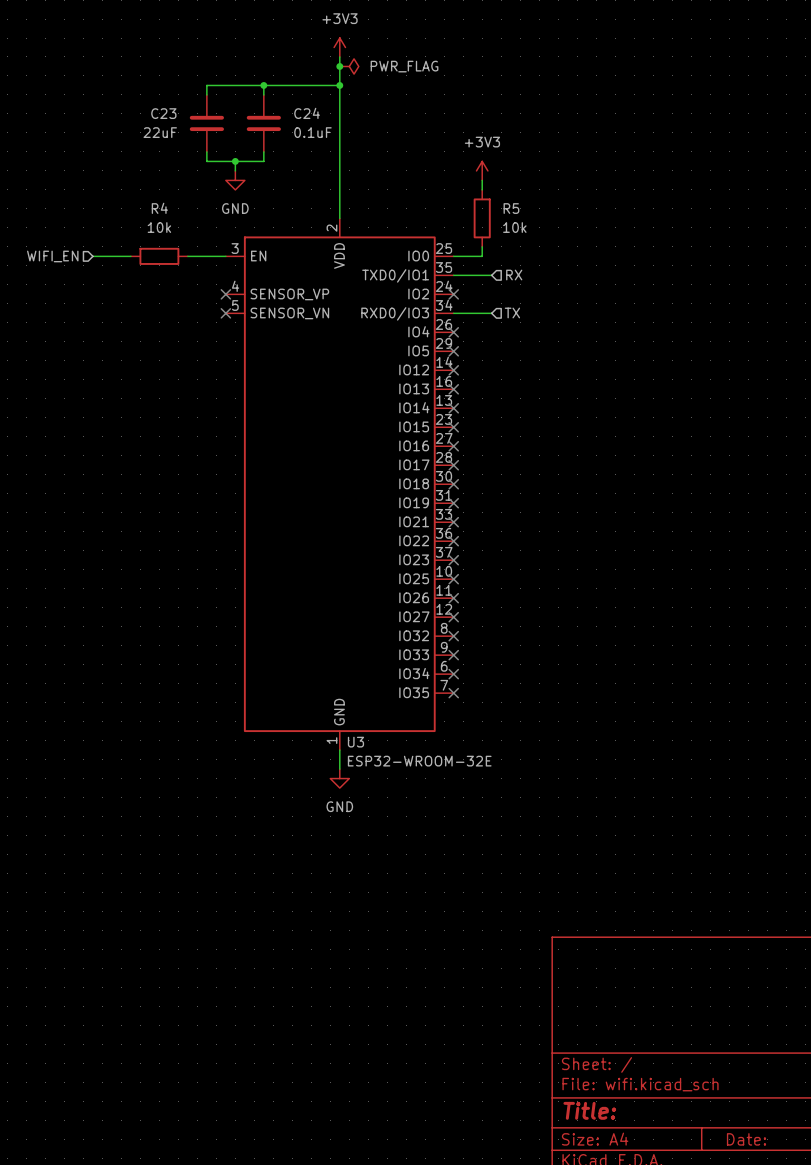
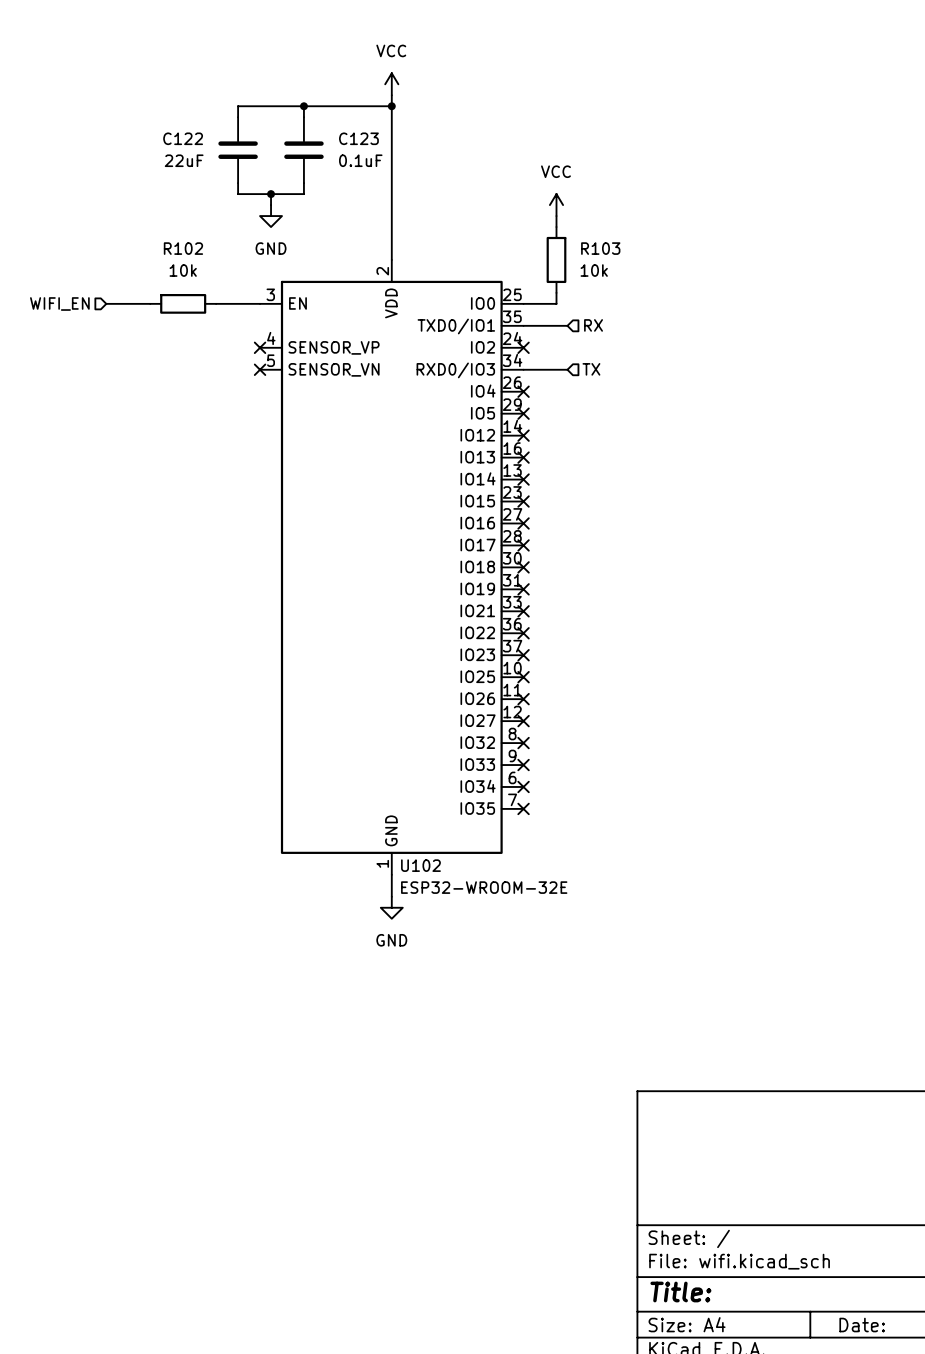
power symbol: +3V3 (339, 47) -> none
junction: (339, 66) -> none
power symbol: none -> VCC (391, 84)
power symbol: PWR_FLAG (349, 66) -> none
C23 name: C23 (163, 113) -> C122 (183, 138)
C24 name: C24 (307, 113) -> C123 (358, 138)
power symbol: +3V3 (482, 170) -> VCC (556, 205)
R4 name: R4 (159, 208) -> R102 (183, 248)
R5 name: R5 (511, 208) -> R103 (600, 248)
U3 name: U3 (355, 742) -> U102 (420, 865)

